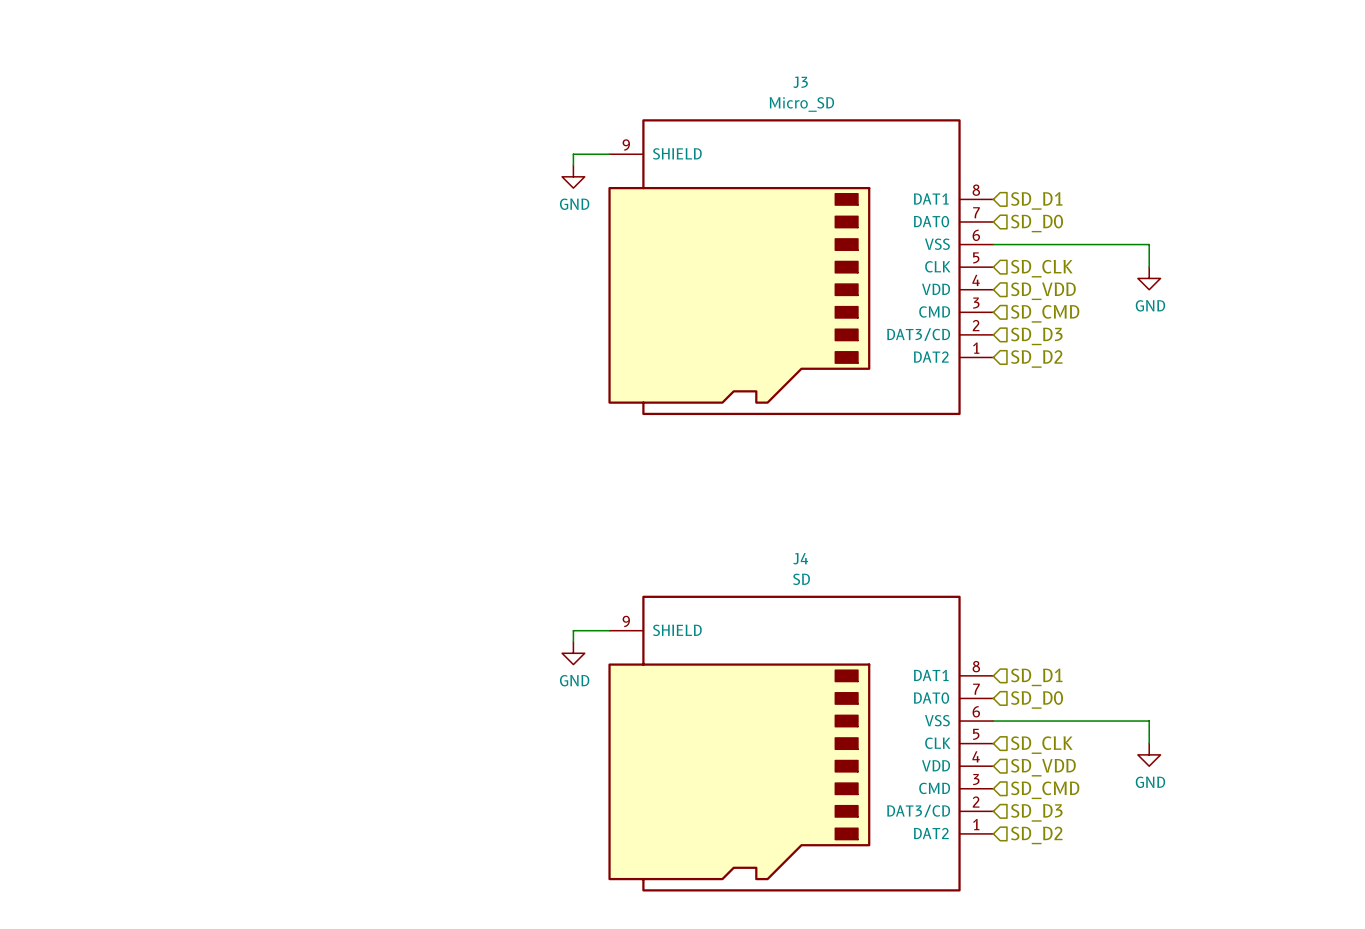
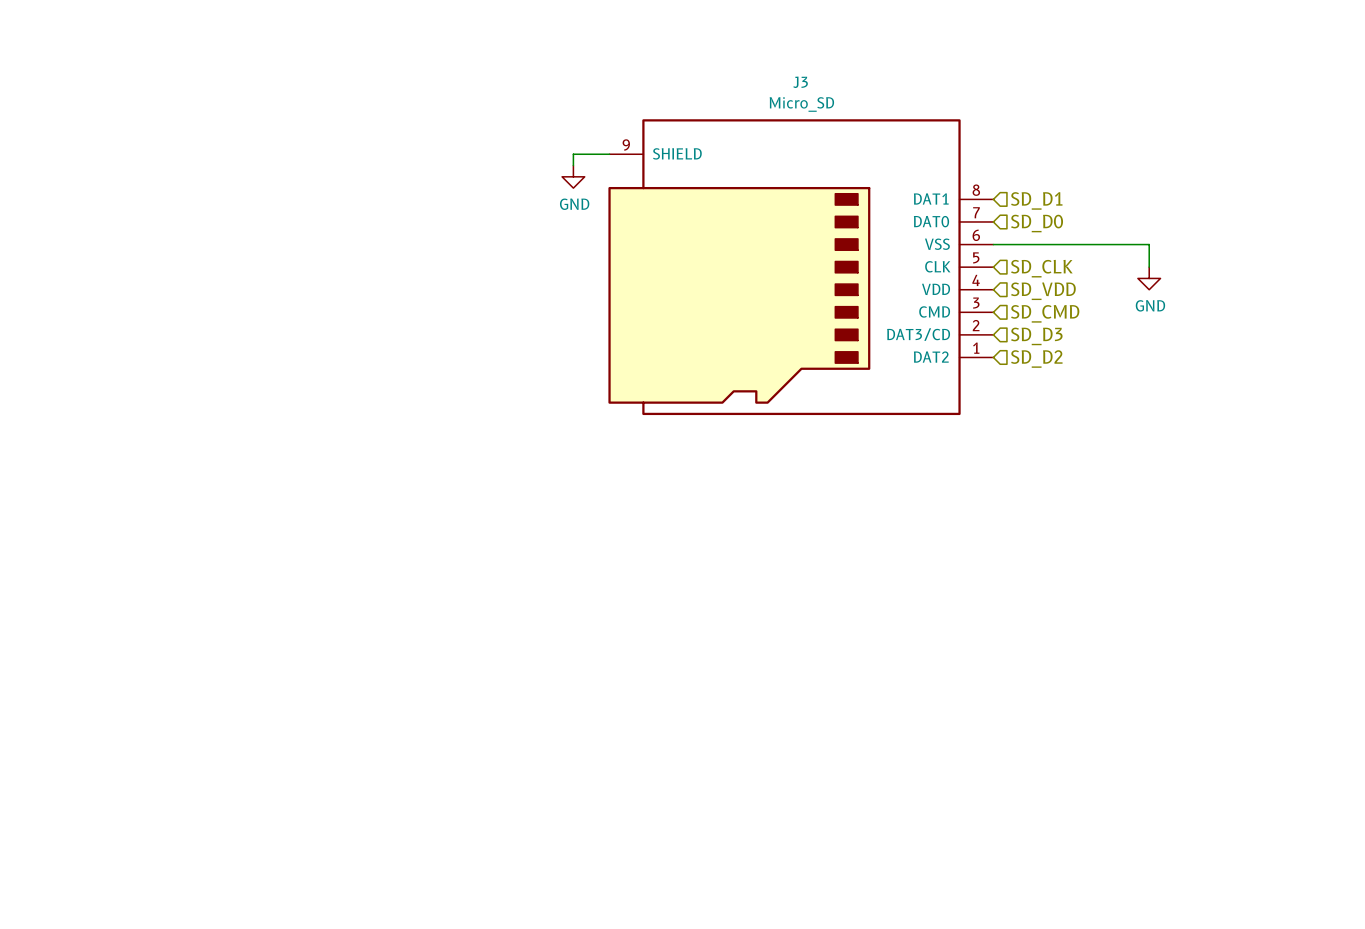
wire: (609, 630) (573, 630) (573, 641) -> none
power symbol: GND (573, 653) -> none
hierarchical label: SD_D1 (1036, 677) -> none
hierarchical label: SD_D0 (1037, 699) -> none
wire: (993, 721) (1149, 721) (1149, 743) -> none
J4: SD (800, 743) -> none
hierarchical label: SD_CLK (1041, 745) -> none
power symbol: GND (1149, 754) -> none
hierarchical label: SD_VDD (1043, 767) -> none
hierarchical label: SD_CMD (1045, 790) -> none
hierarchical label: SD_D3 (1036, 812) -> none
hierarchical label: SD_D2 (1036, 835) -> none

